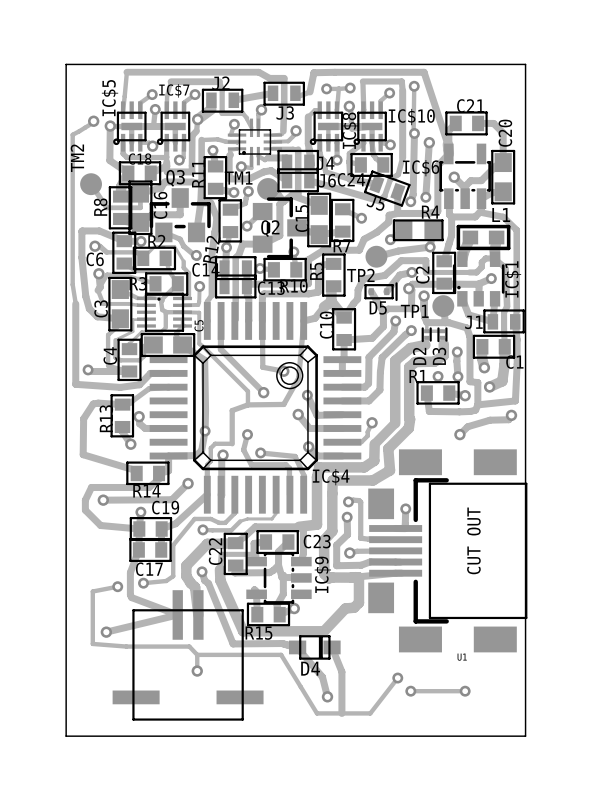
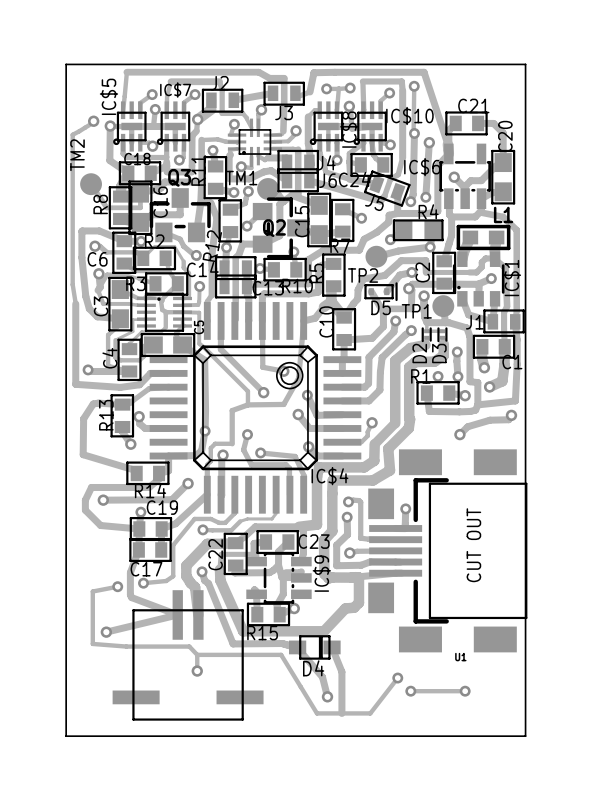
track: none -> (301, 571) (285, 572)

